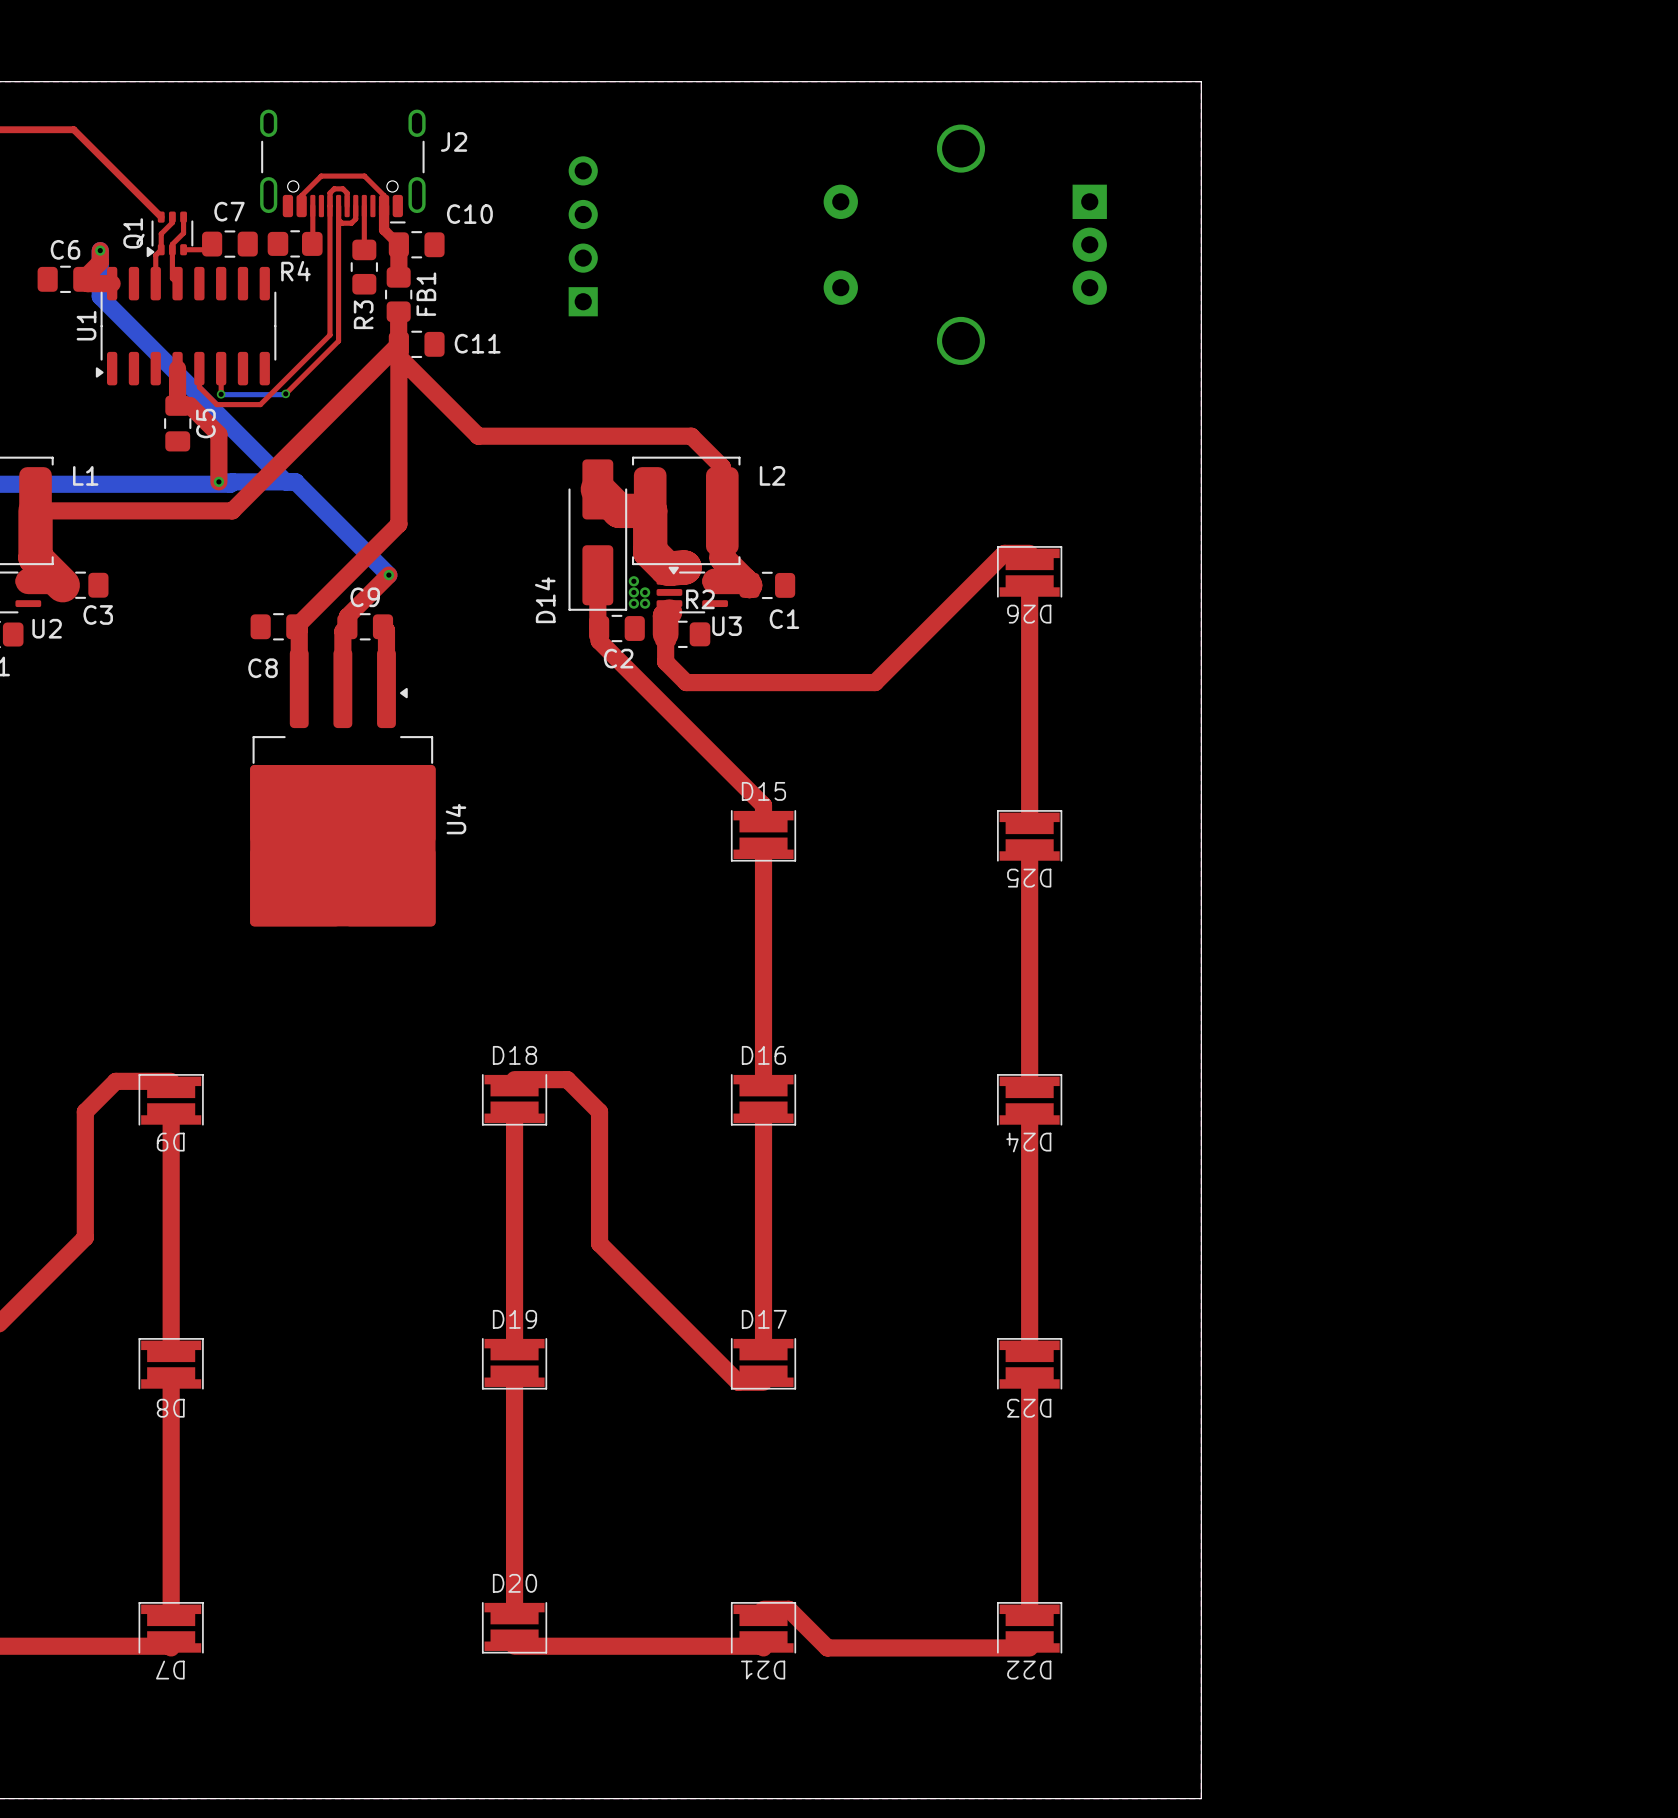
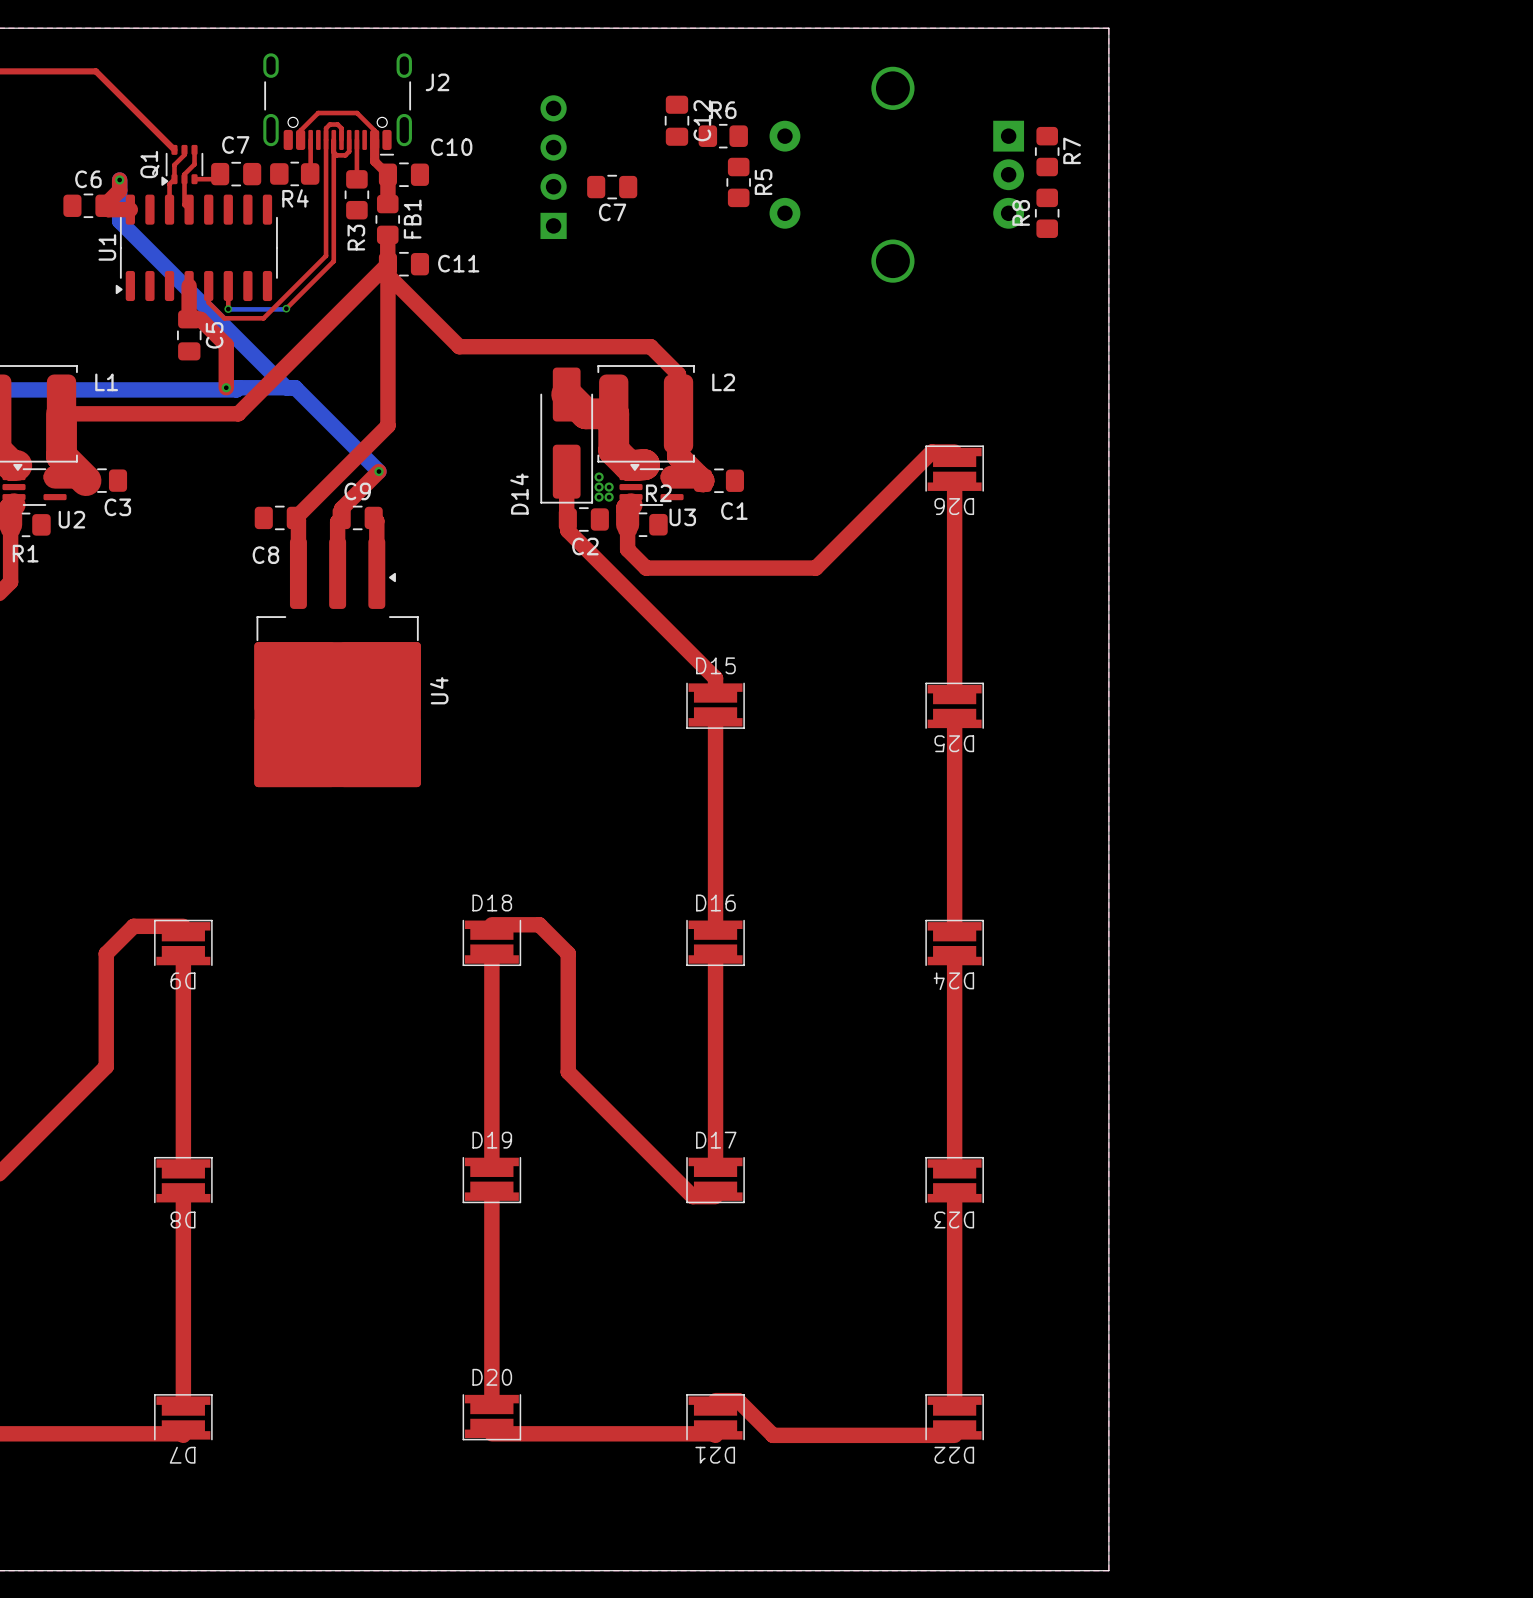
C12: none -> (676, 120)
R6: none -> (723, 136)
R7: none -> (1047, 151)
R5: none -> (738, 182)
C7: none -> (612, 187)
R8: none -> (1047, 213)

